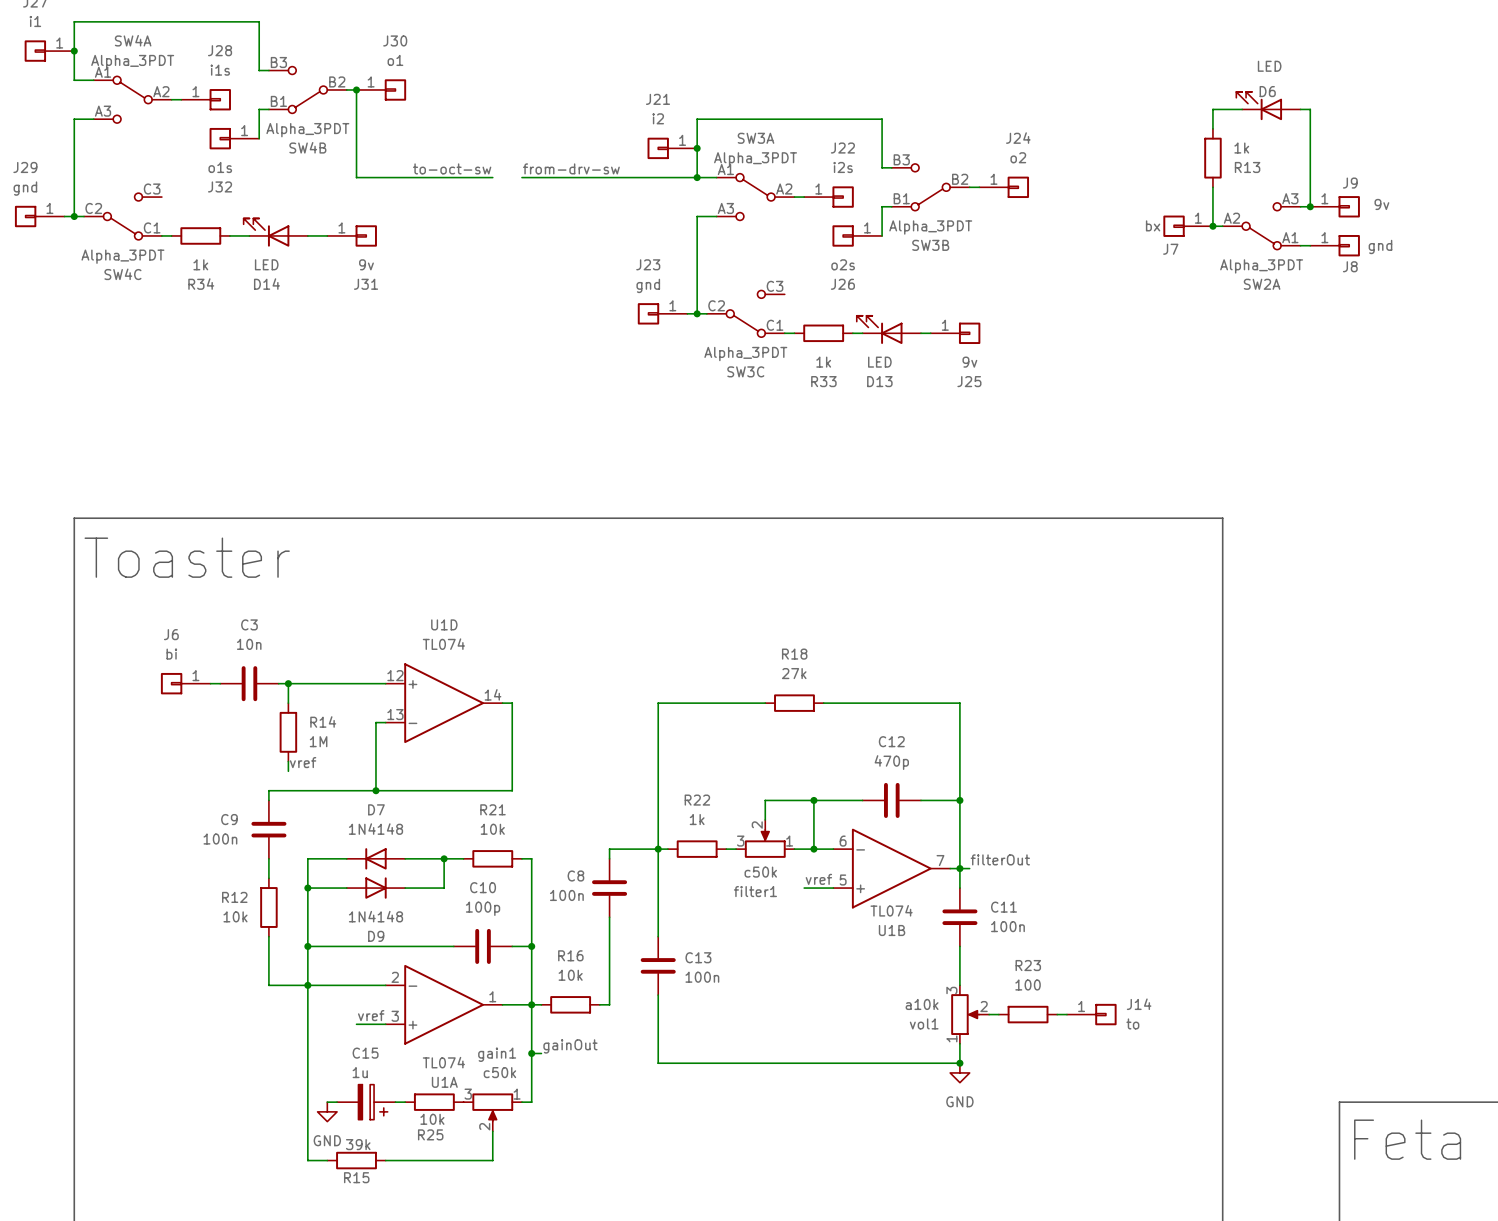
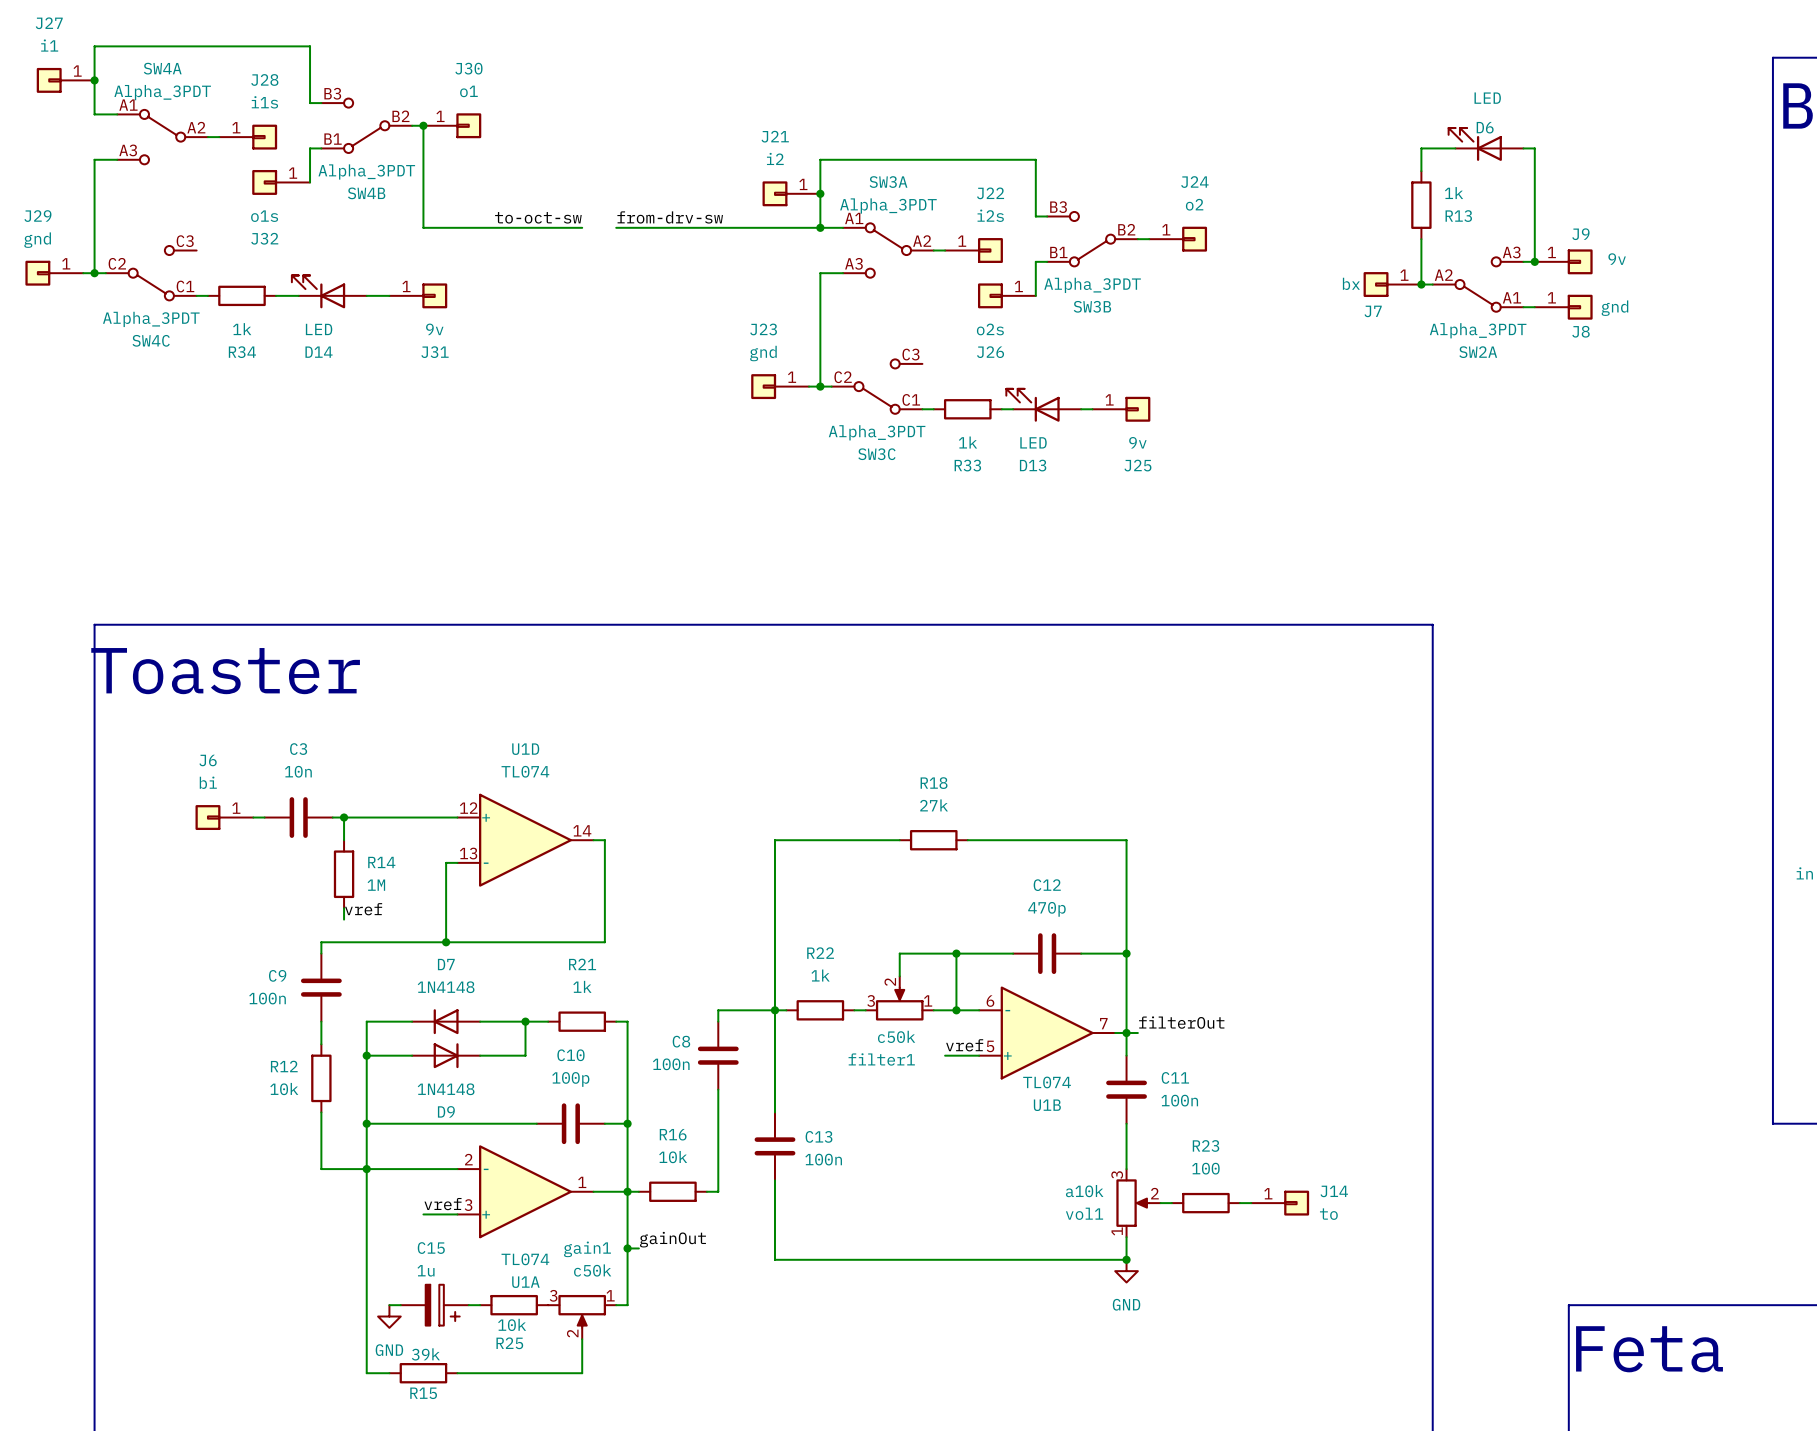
R21 value: 10k (492, 829) -> 1k (582, 986)

